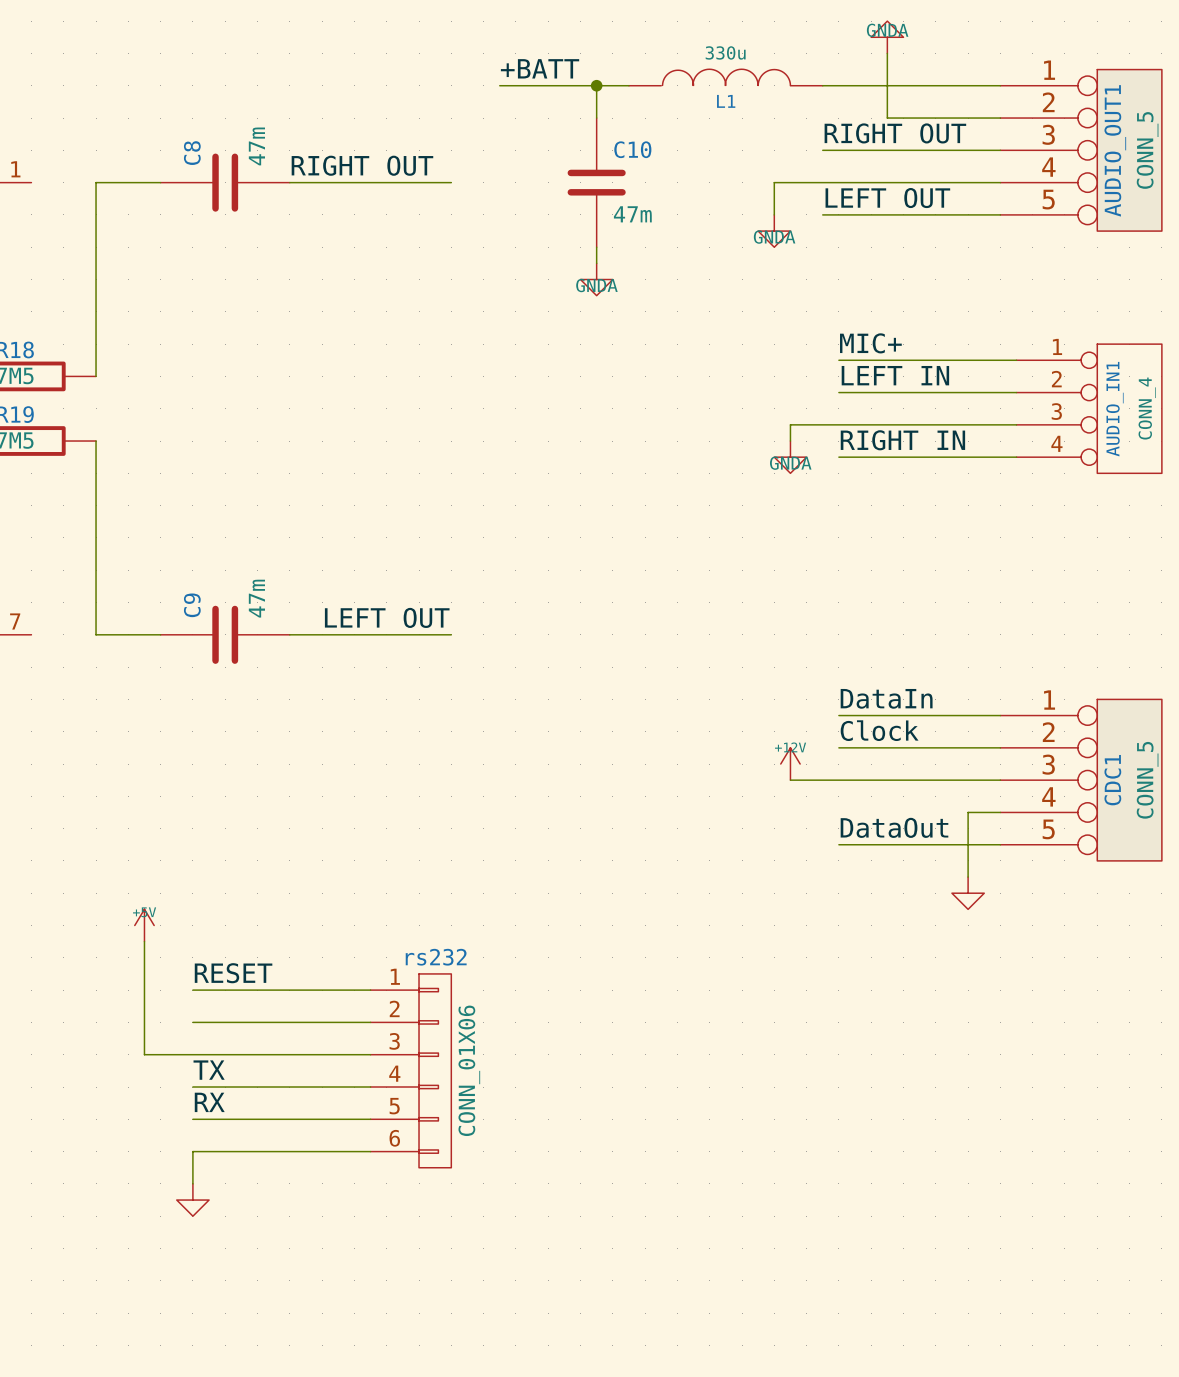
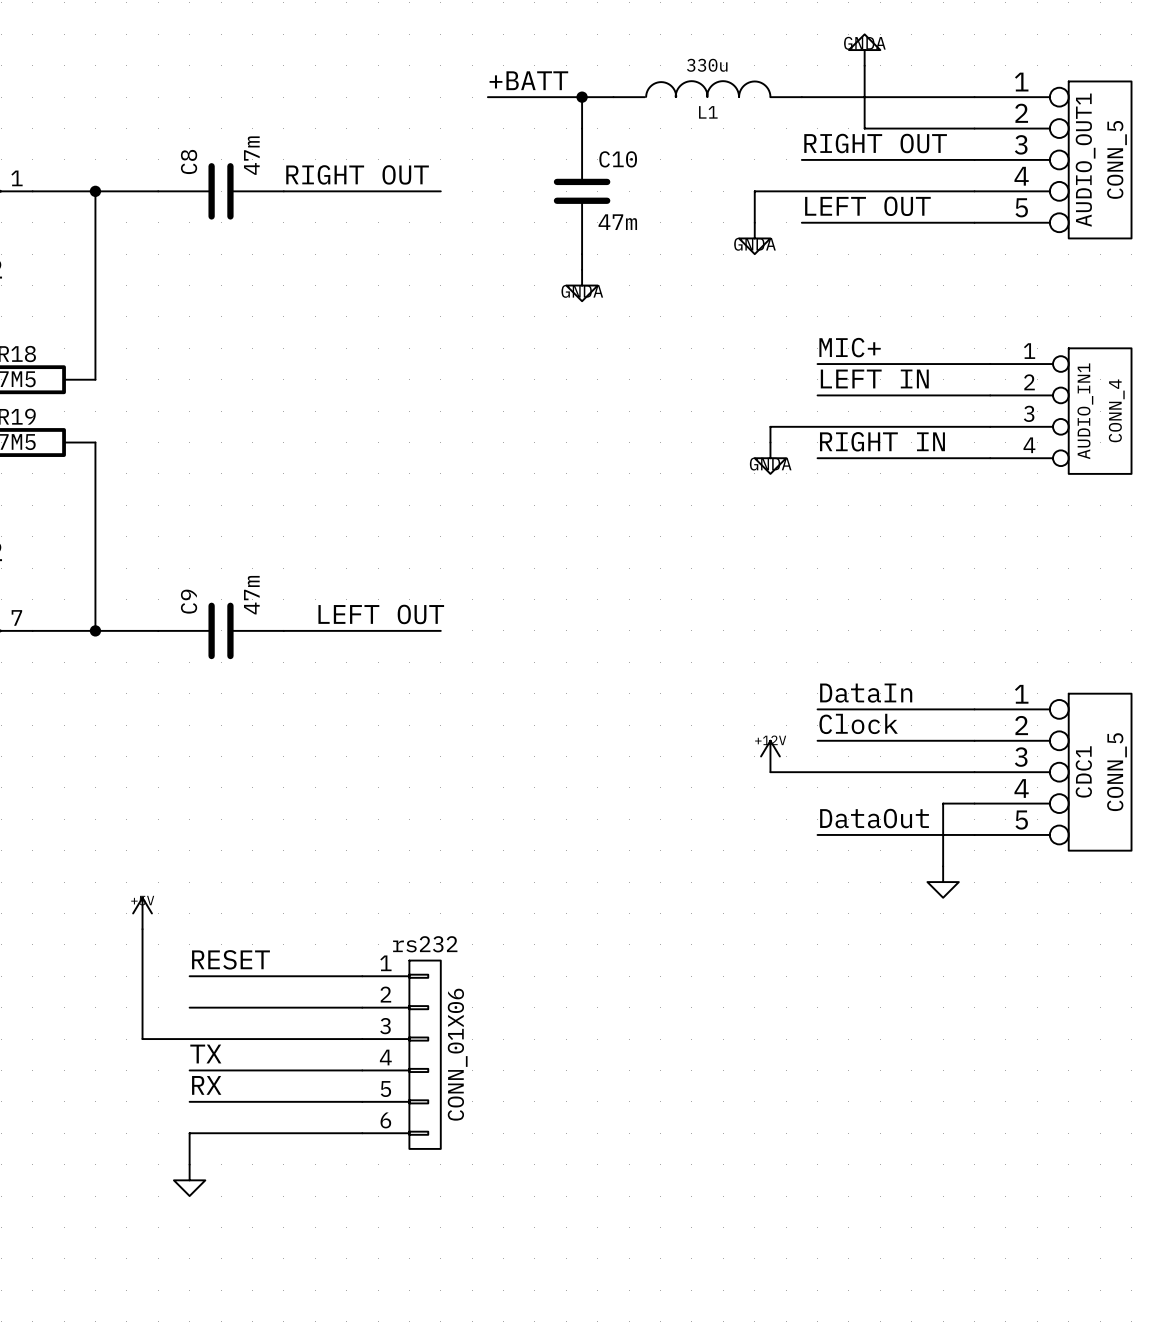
wire: none -> (32, 191) (95, 191)
junction: none -> (95, 191)
wire: none -> (32, 630) (95, 630)
junction: none -> (95, 630)

